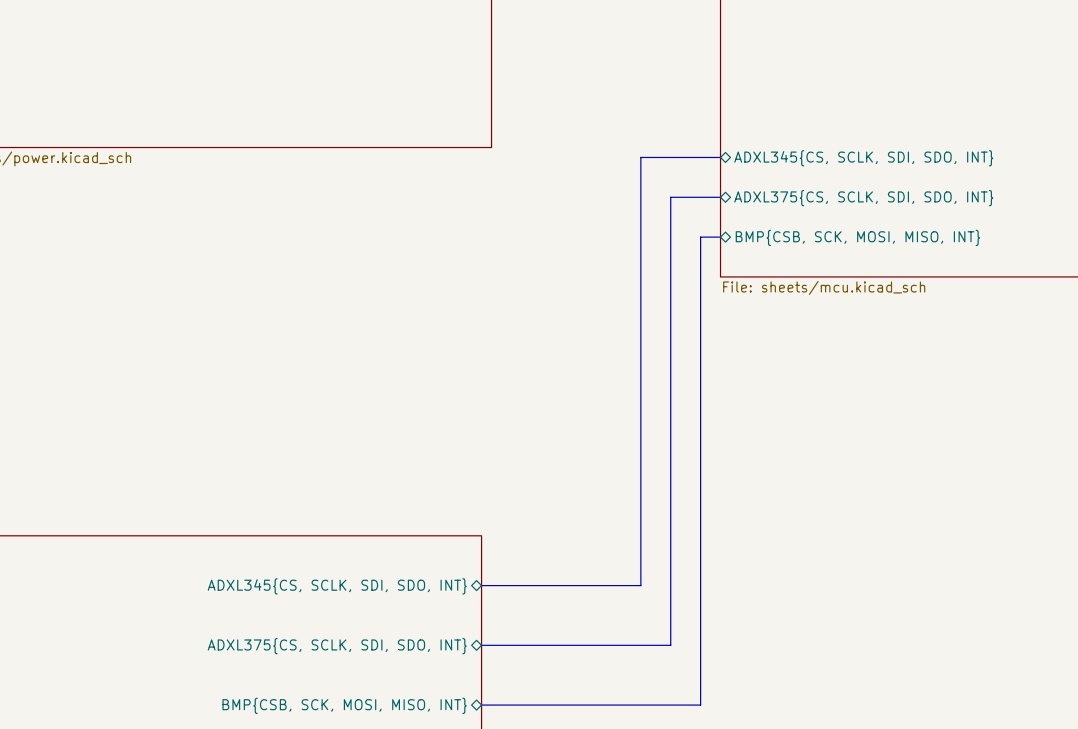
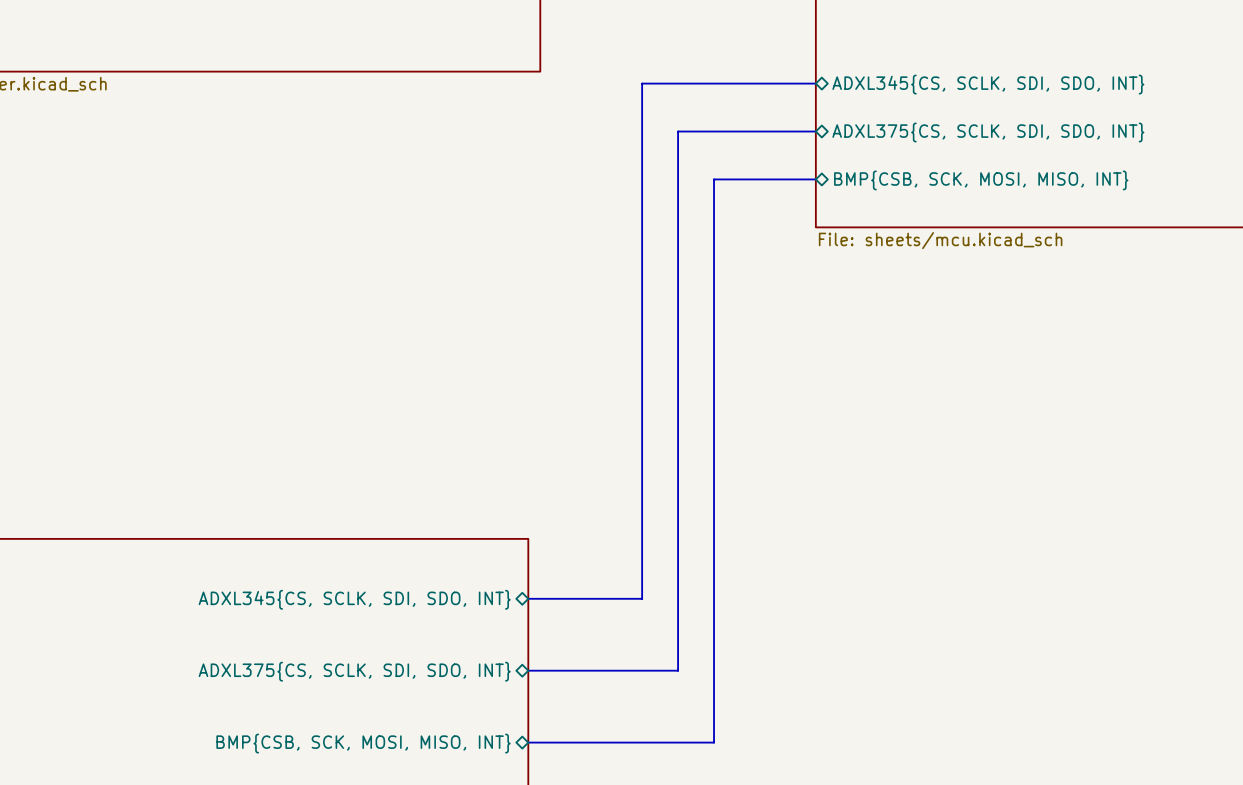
bus: (640, 157) (640, 585) (576, 585) -> (720, 83) (642, 83) (642, 598)
bus: (670, 197) (670, 645) (606, 645) -> (755, 131) (678, 131) (678, 670)
bus: (700, 237) (700, 705) (635, 705) -> (791, 179) (714, 179) (714, 742)

